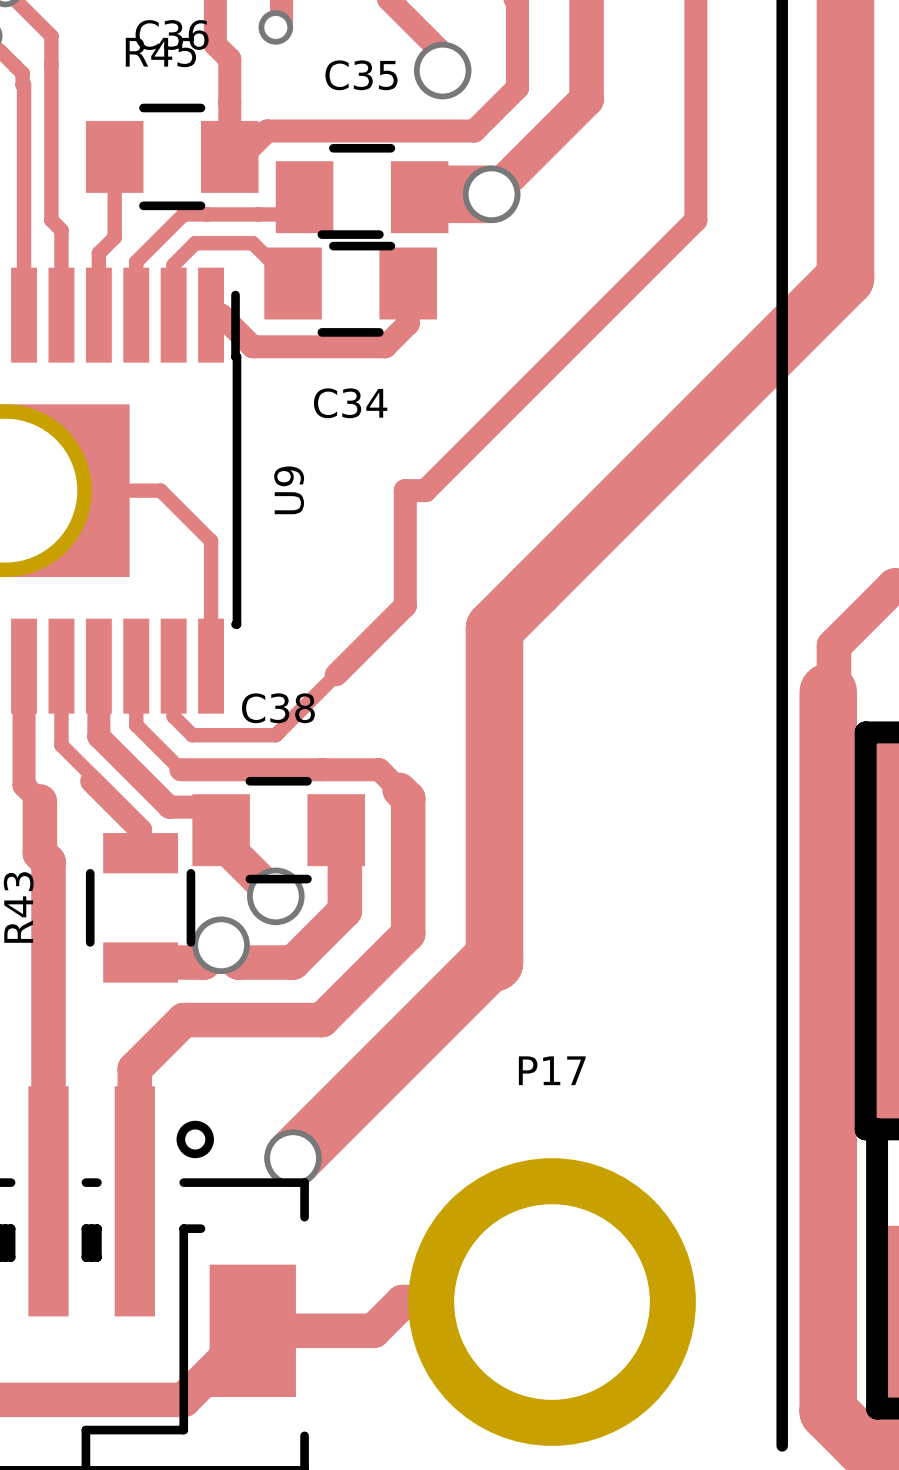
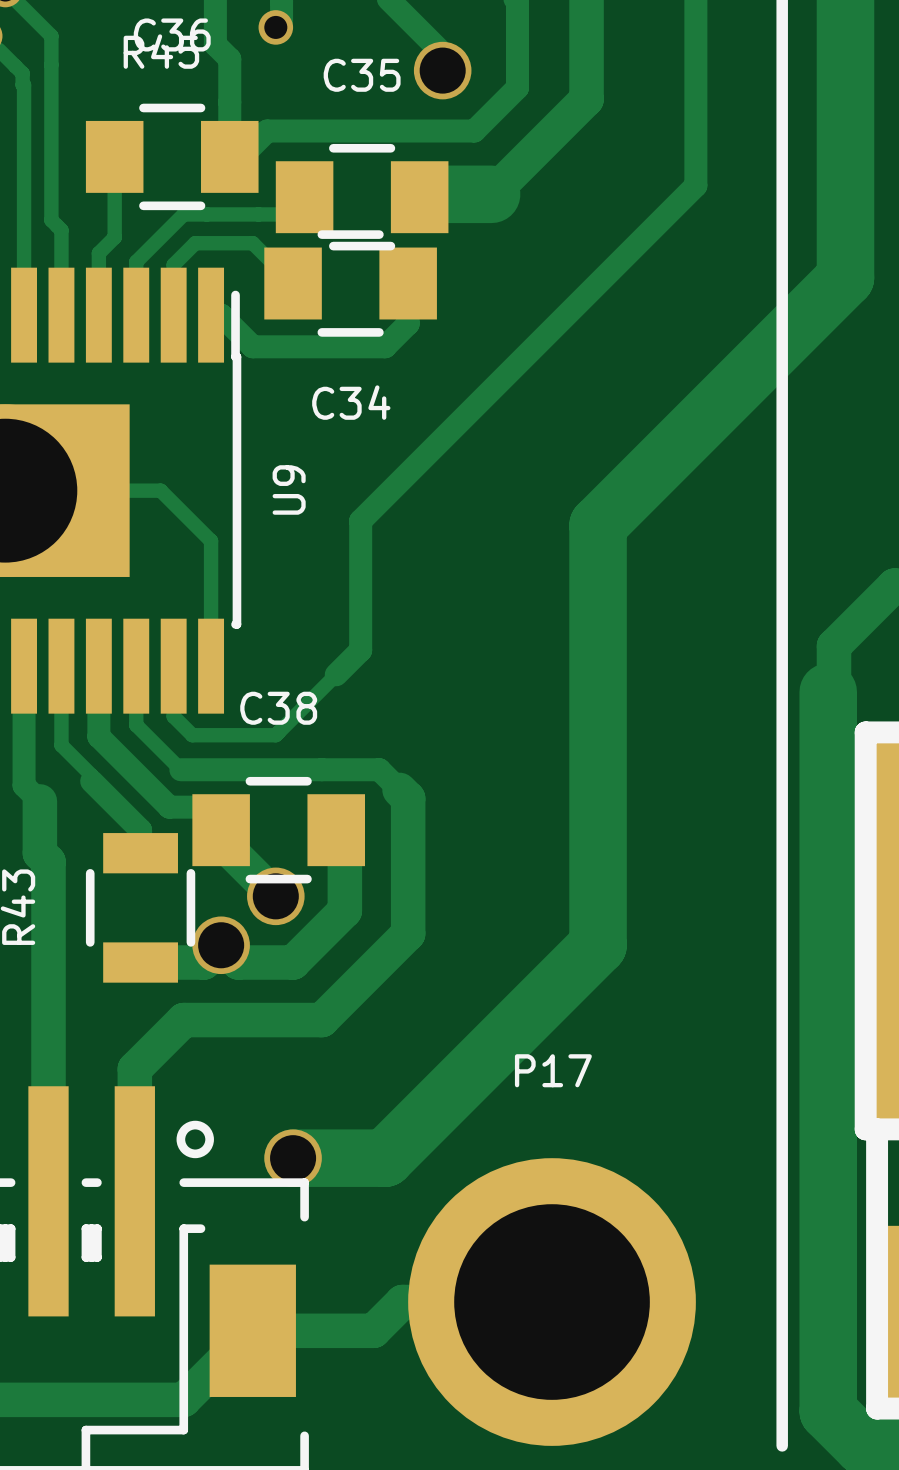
track: (695, 185) (695, 220) (425, 490) (405, 490) (405, 605) (360, 650) -> (695, 185) (360, 520) (360, 650)
via: (491, 194) -> none
track: (598, 525) (494, 628) (494, 962) (488, 962) (293, 1158) -> (598, 525) (598, 945) (385, 1158) (293, 1158)

